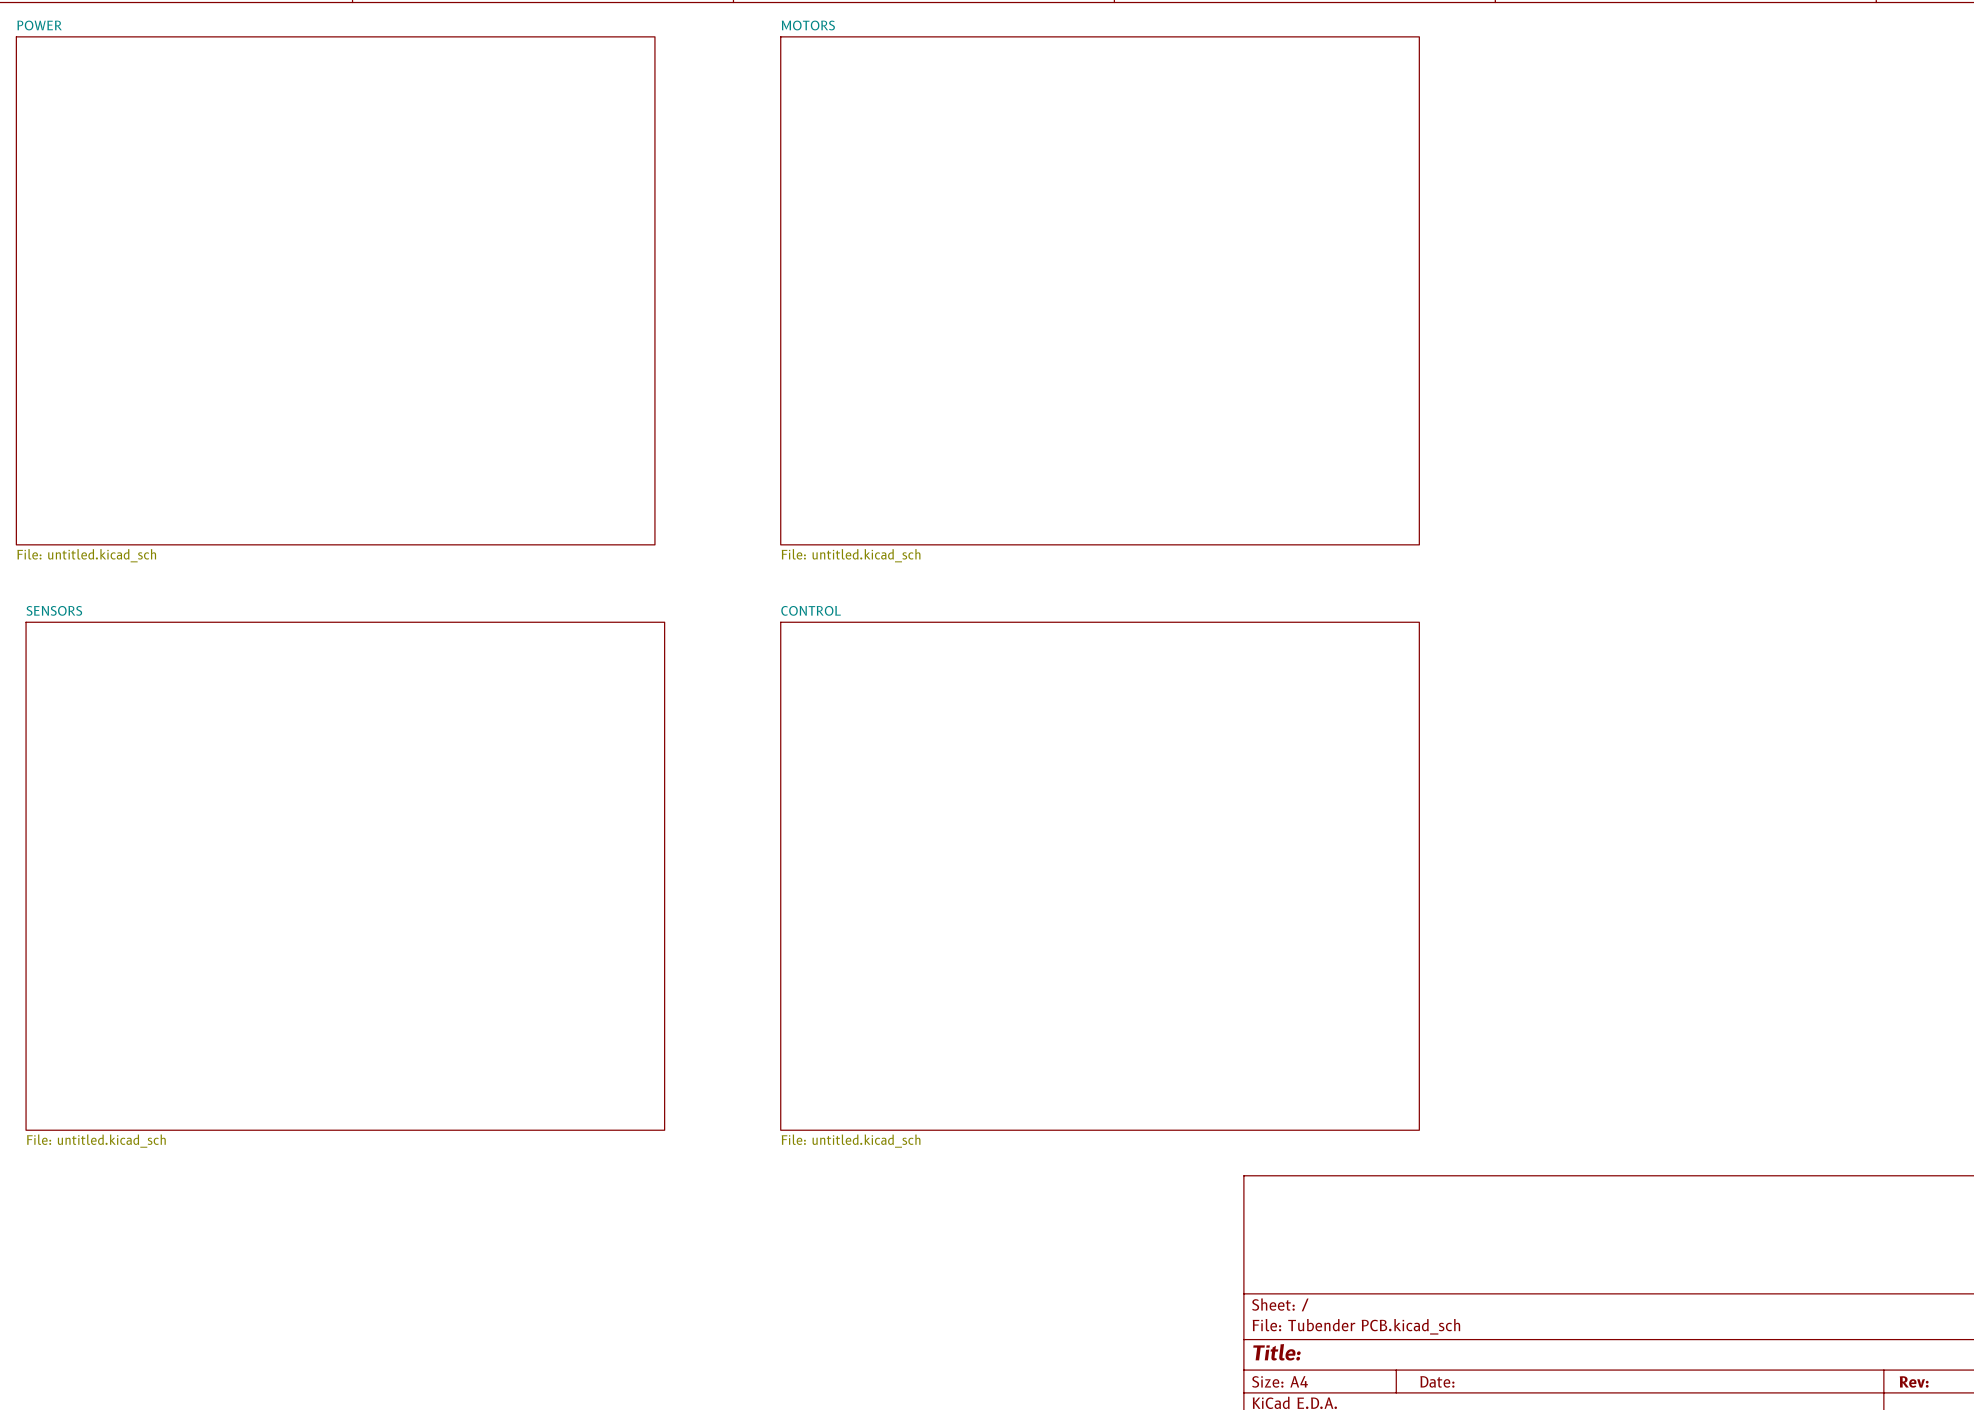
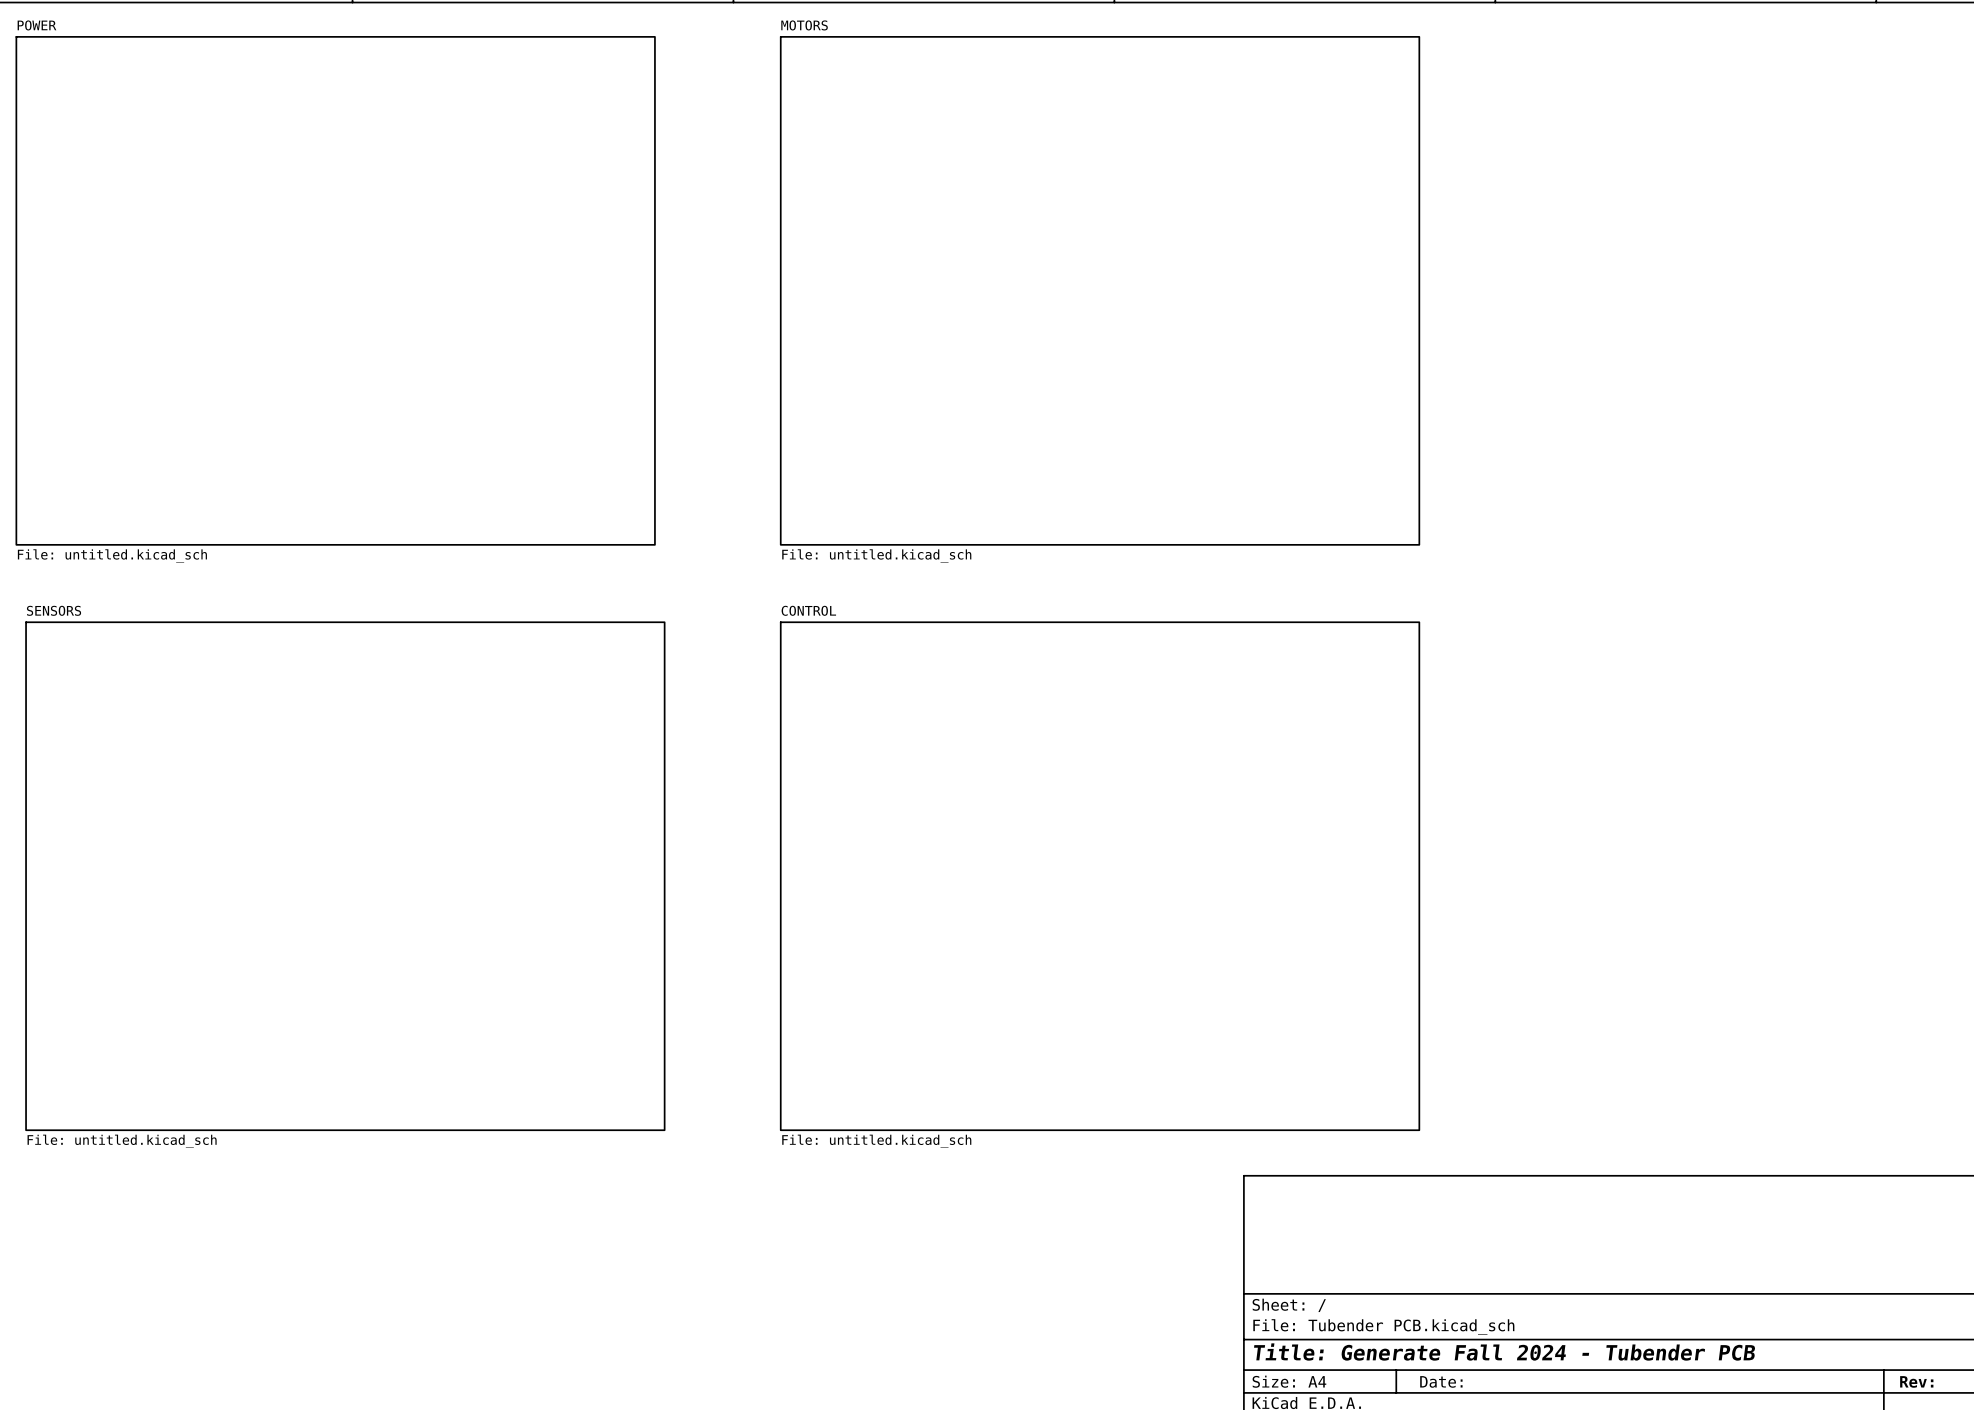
title block: Title: (1276, 1352) -> Title: Generate Fall 2024 - Tubender PCB (1504, 1352)

